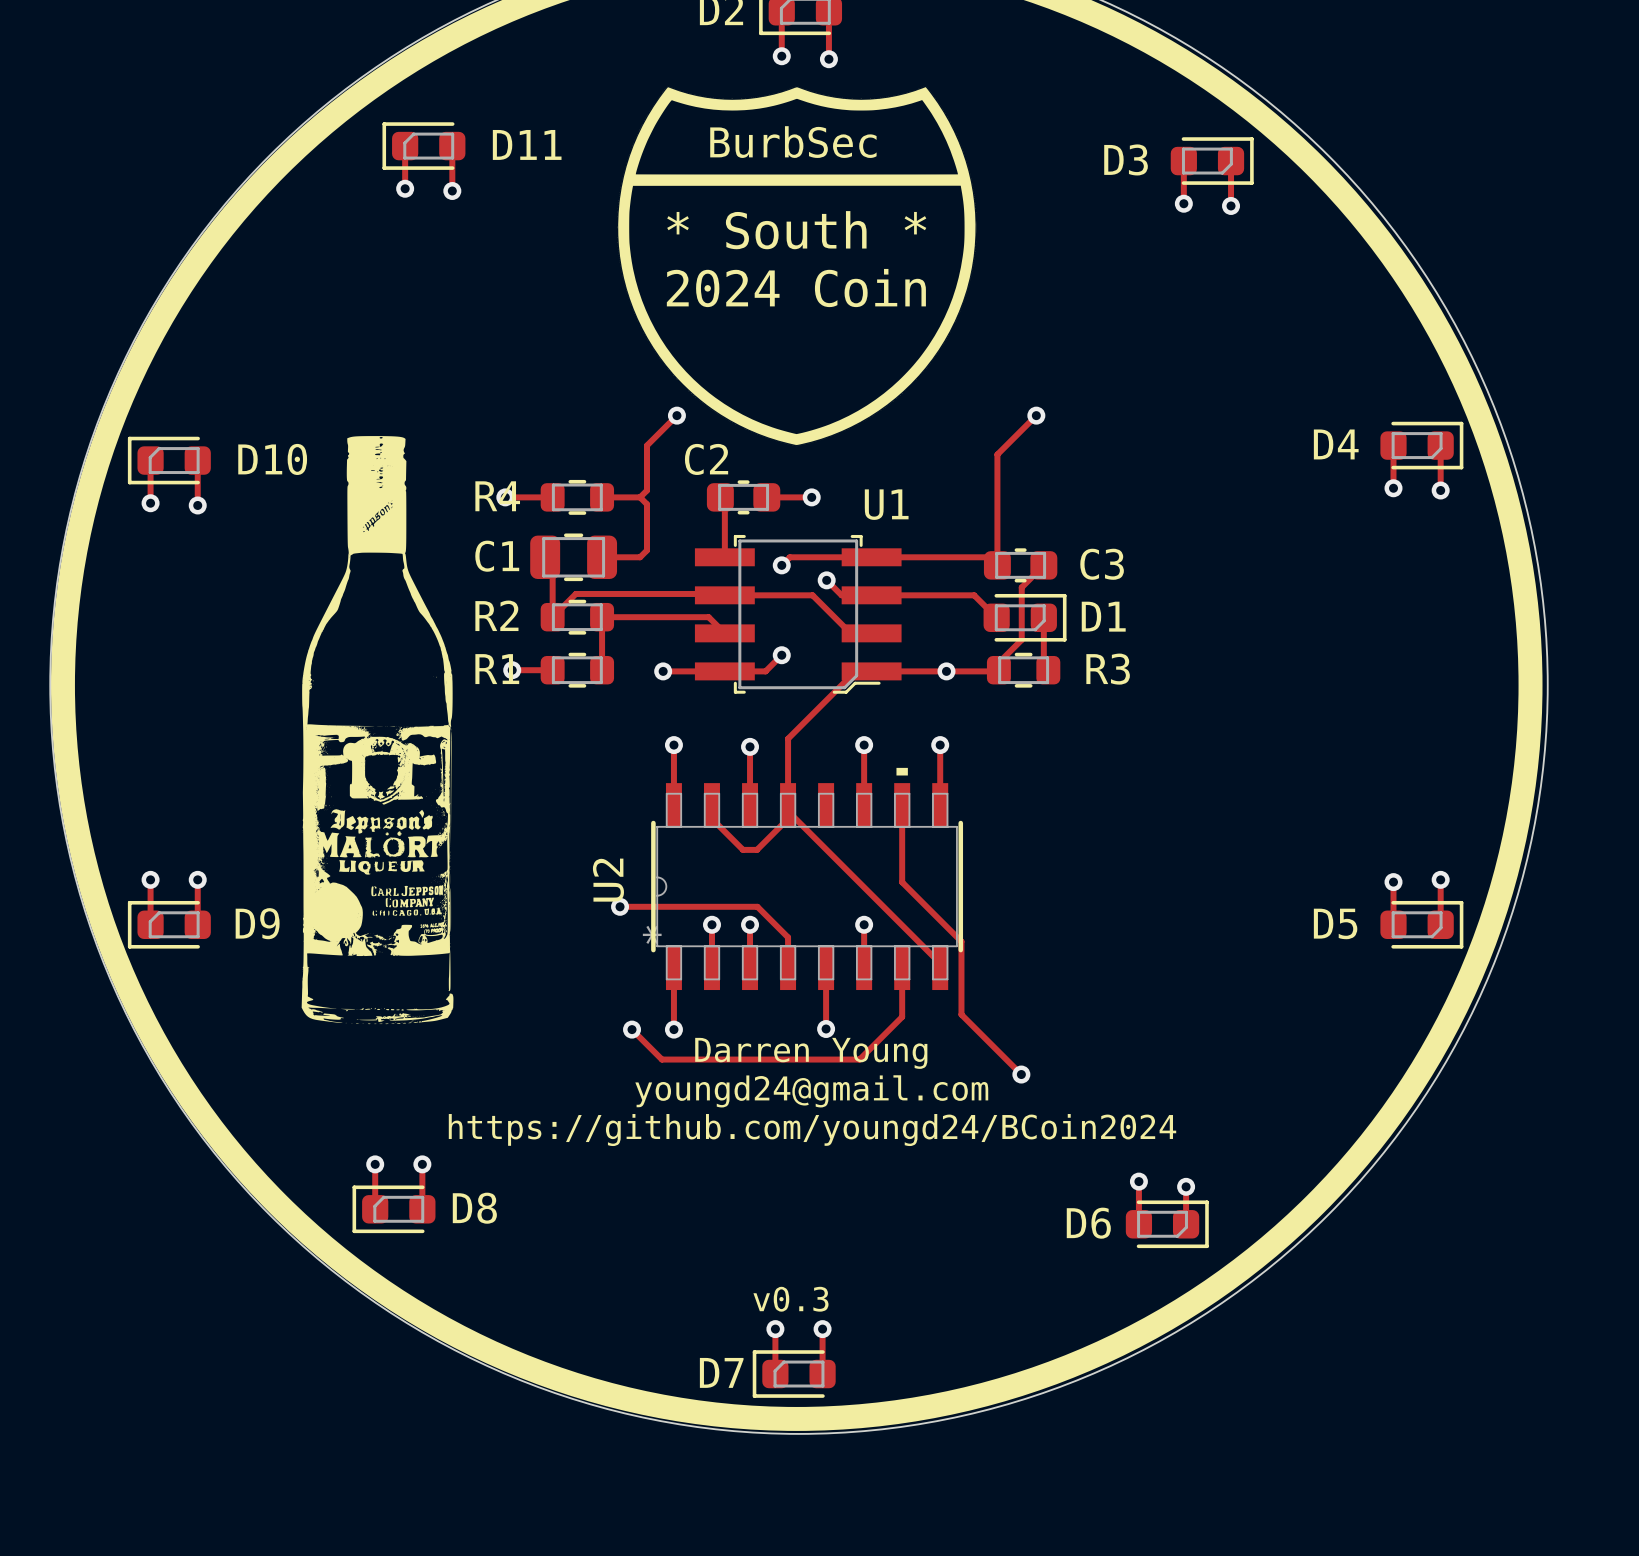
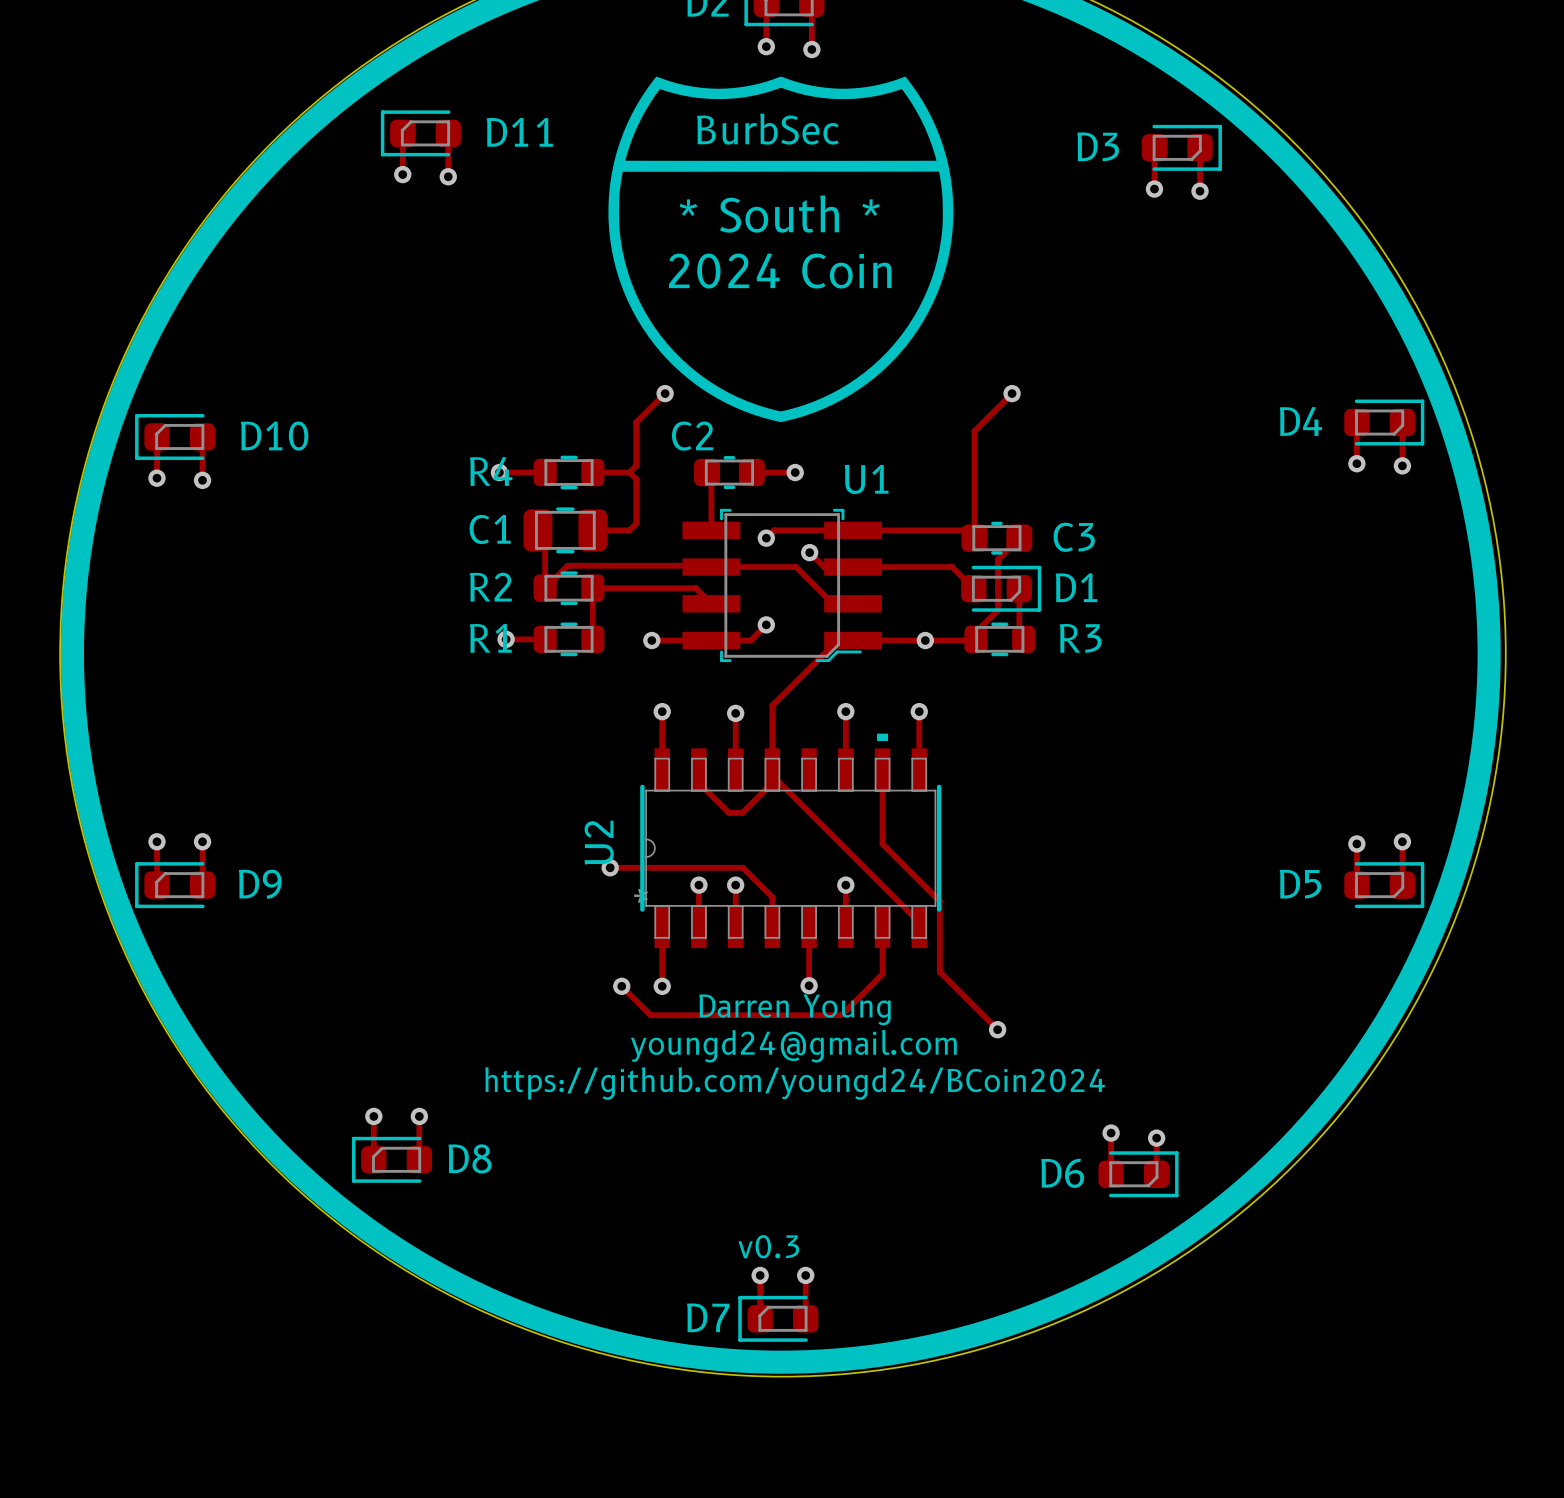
drawing: [301, 436, 454, 1025] -> none

